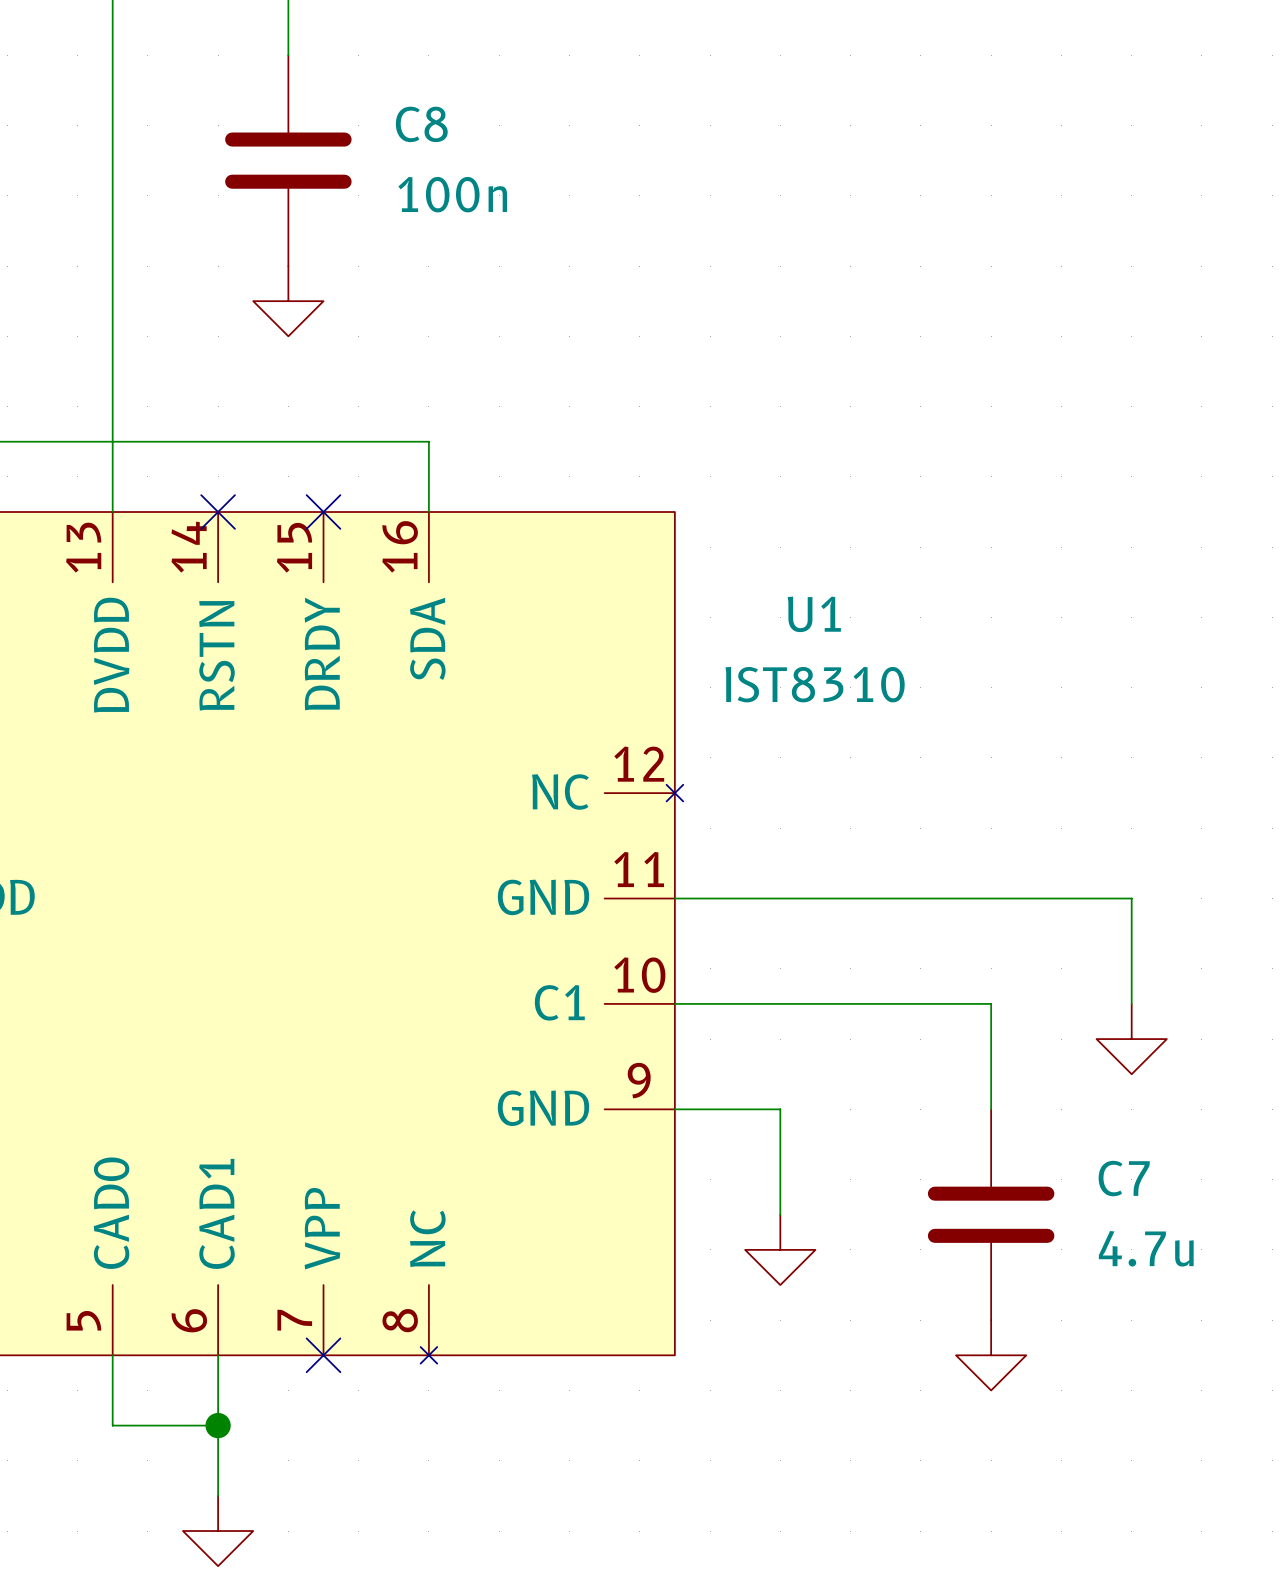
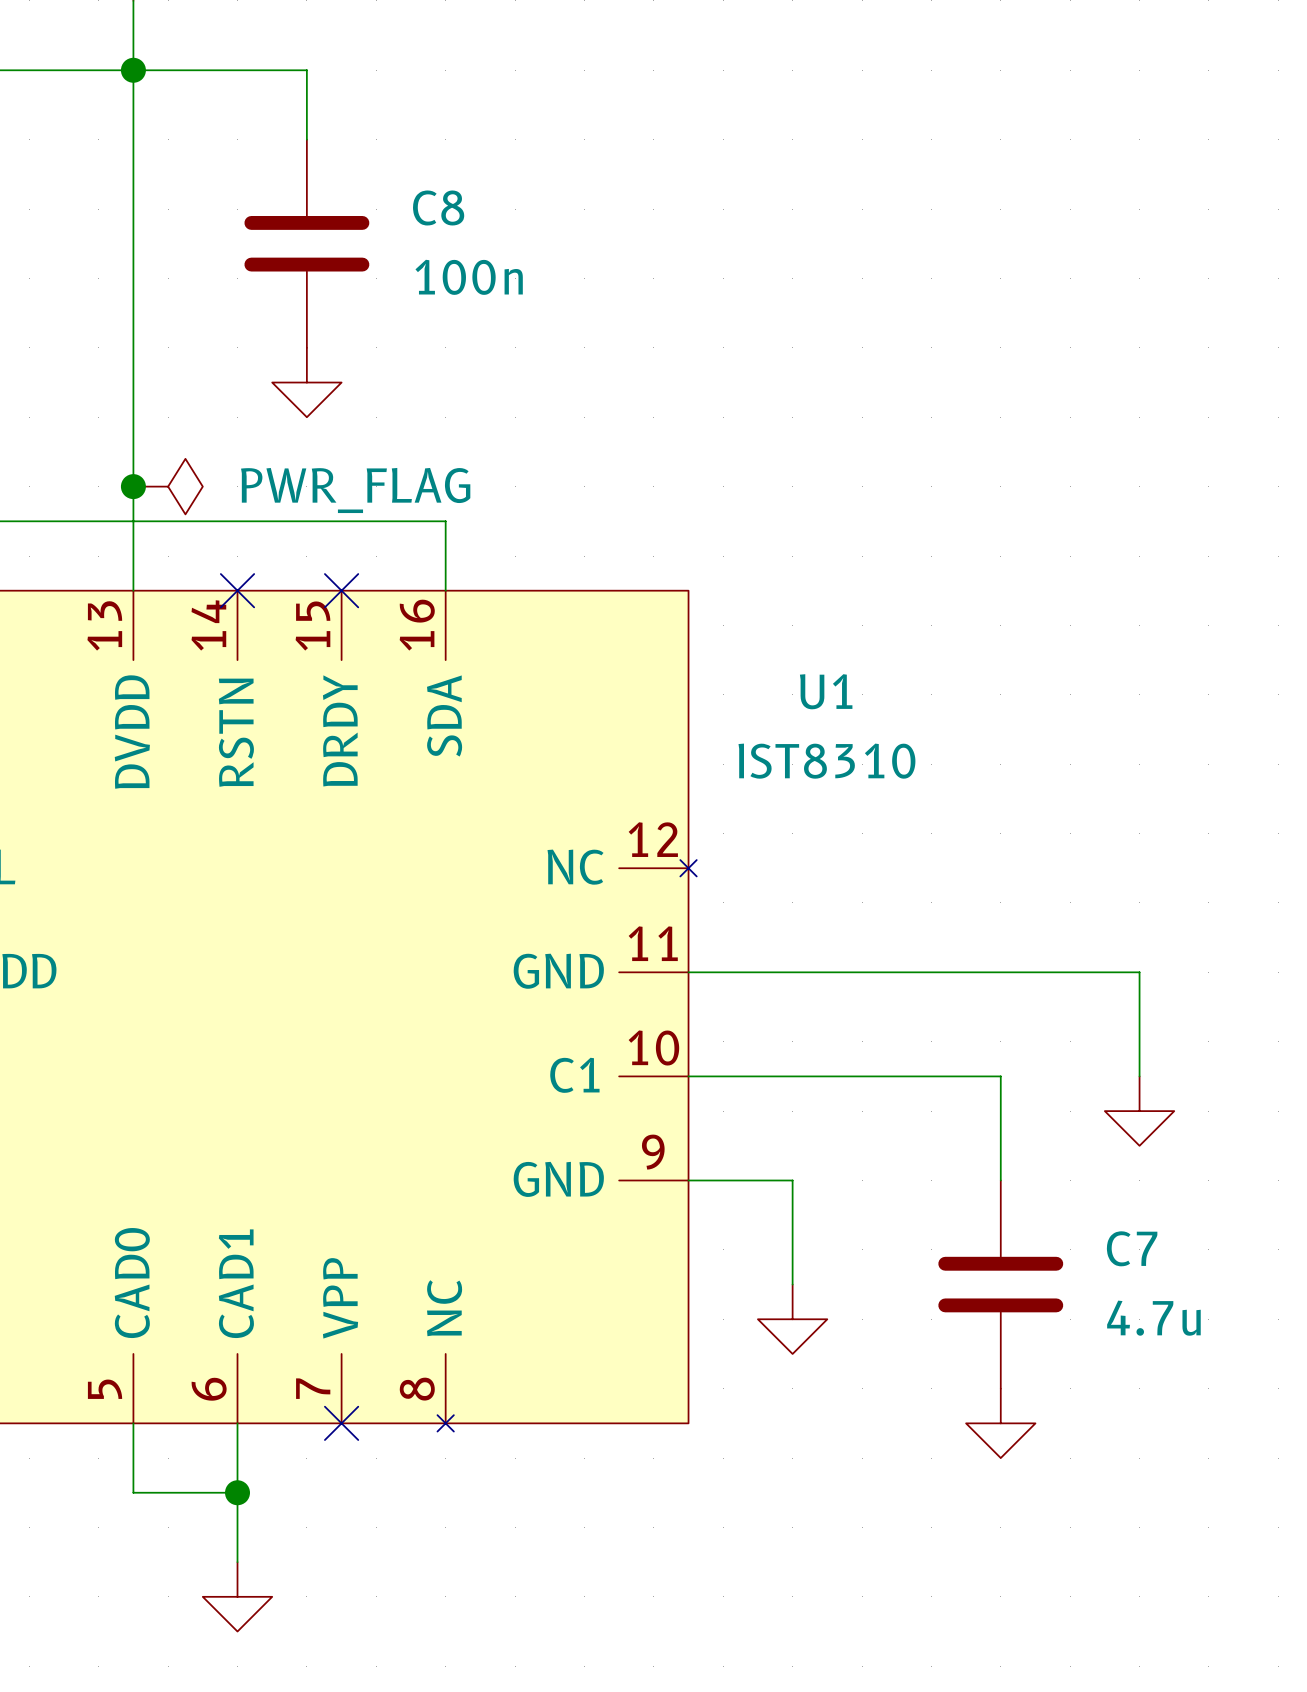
junction: none -> (133, 486)
power symbol: none -> PWR_FLAG (168, 486)

